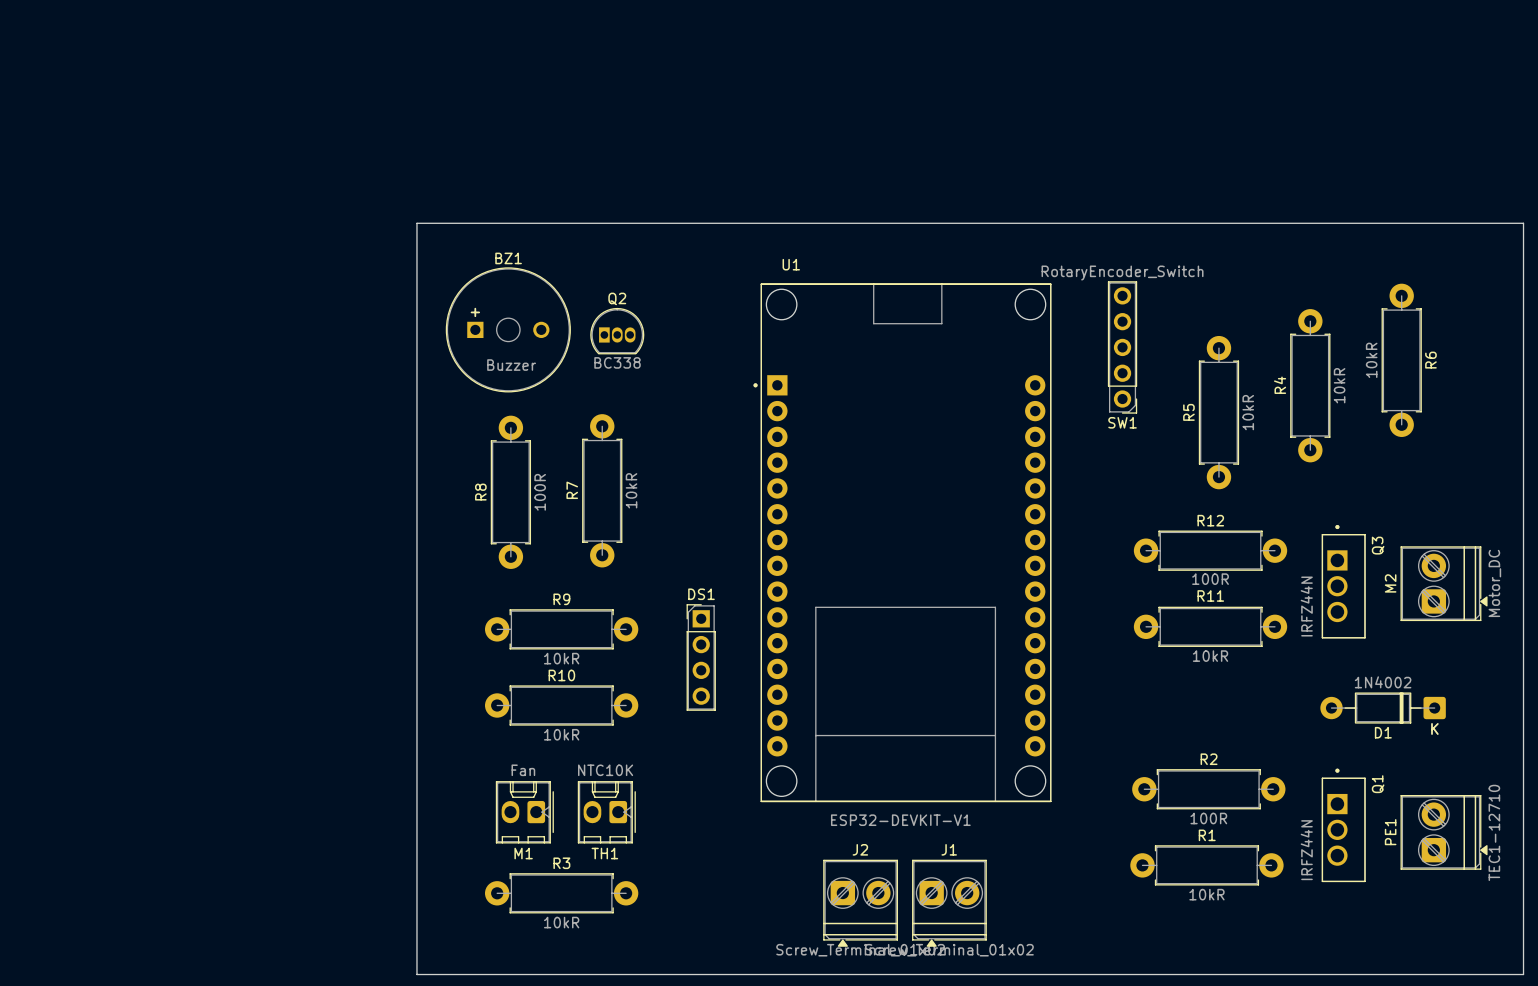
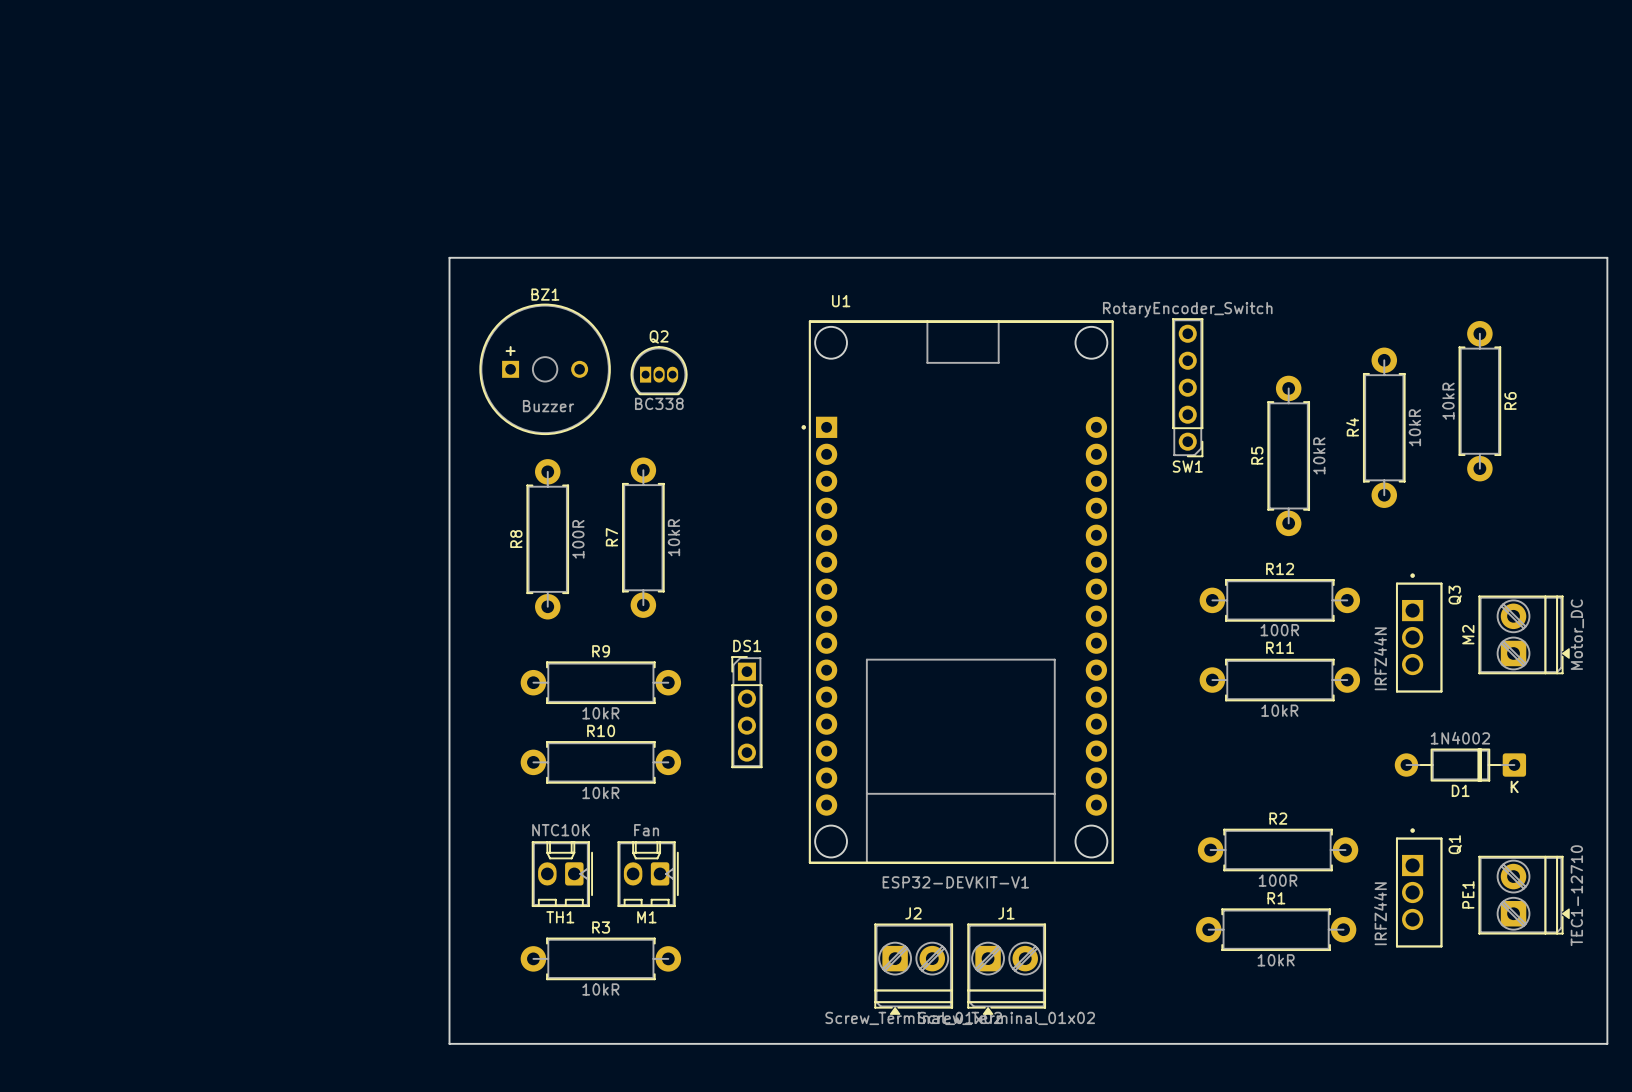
M1 value: Fan (523, 770) -> NTC10K (561, 830)
TH1 value: NTC10K (605, 770) -> Fan (646, 830)
M1 name: M1 (523, 853) -> TH1 (560, 917)
TH1 name: TH1 (604, 853) -> M1 (646, 917)

